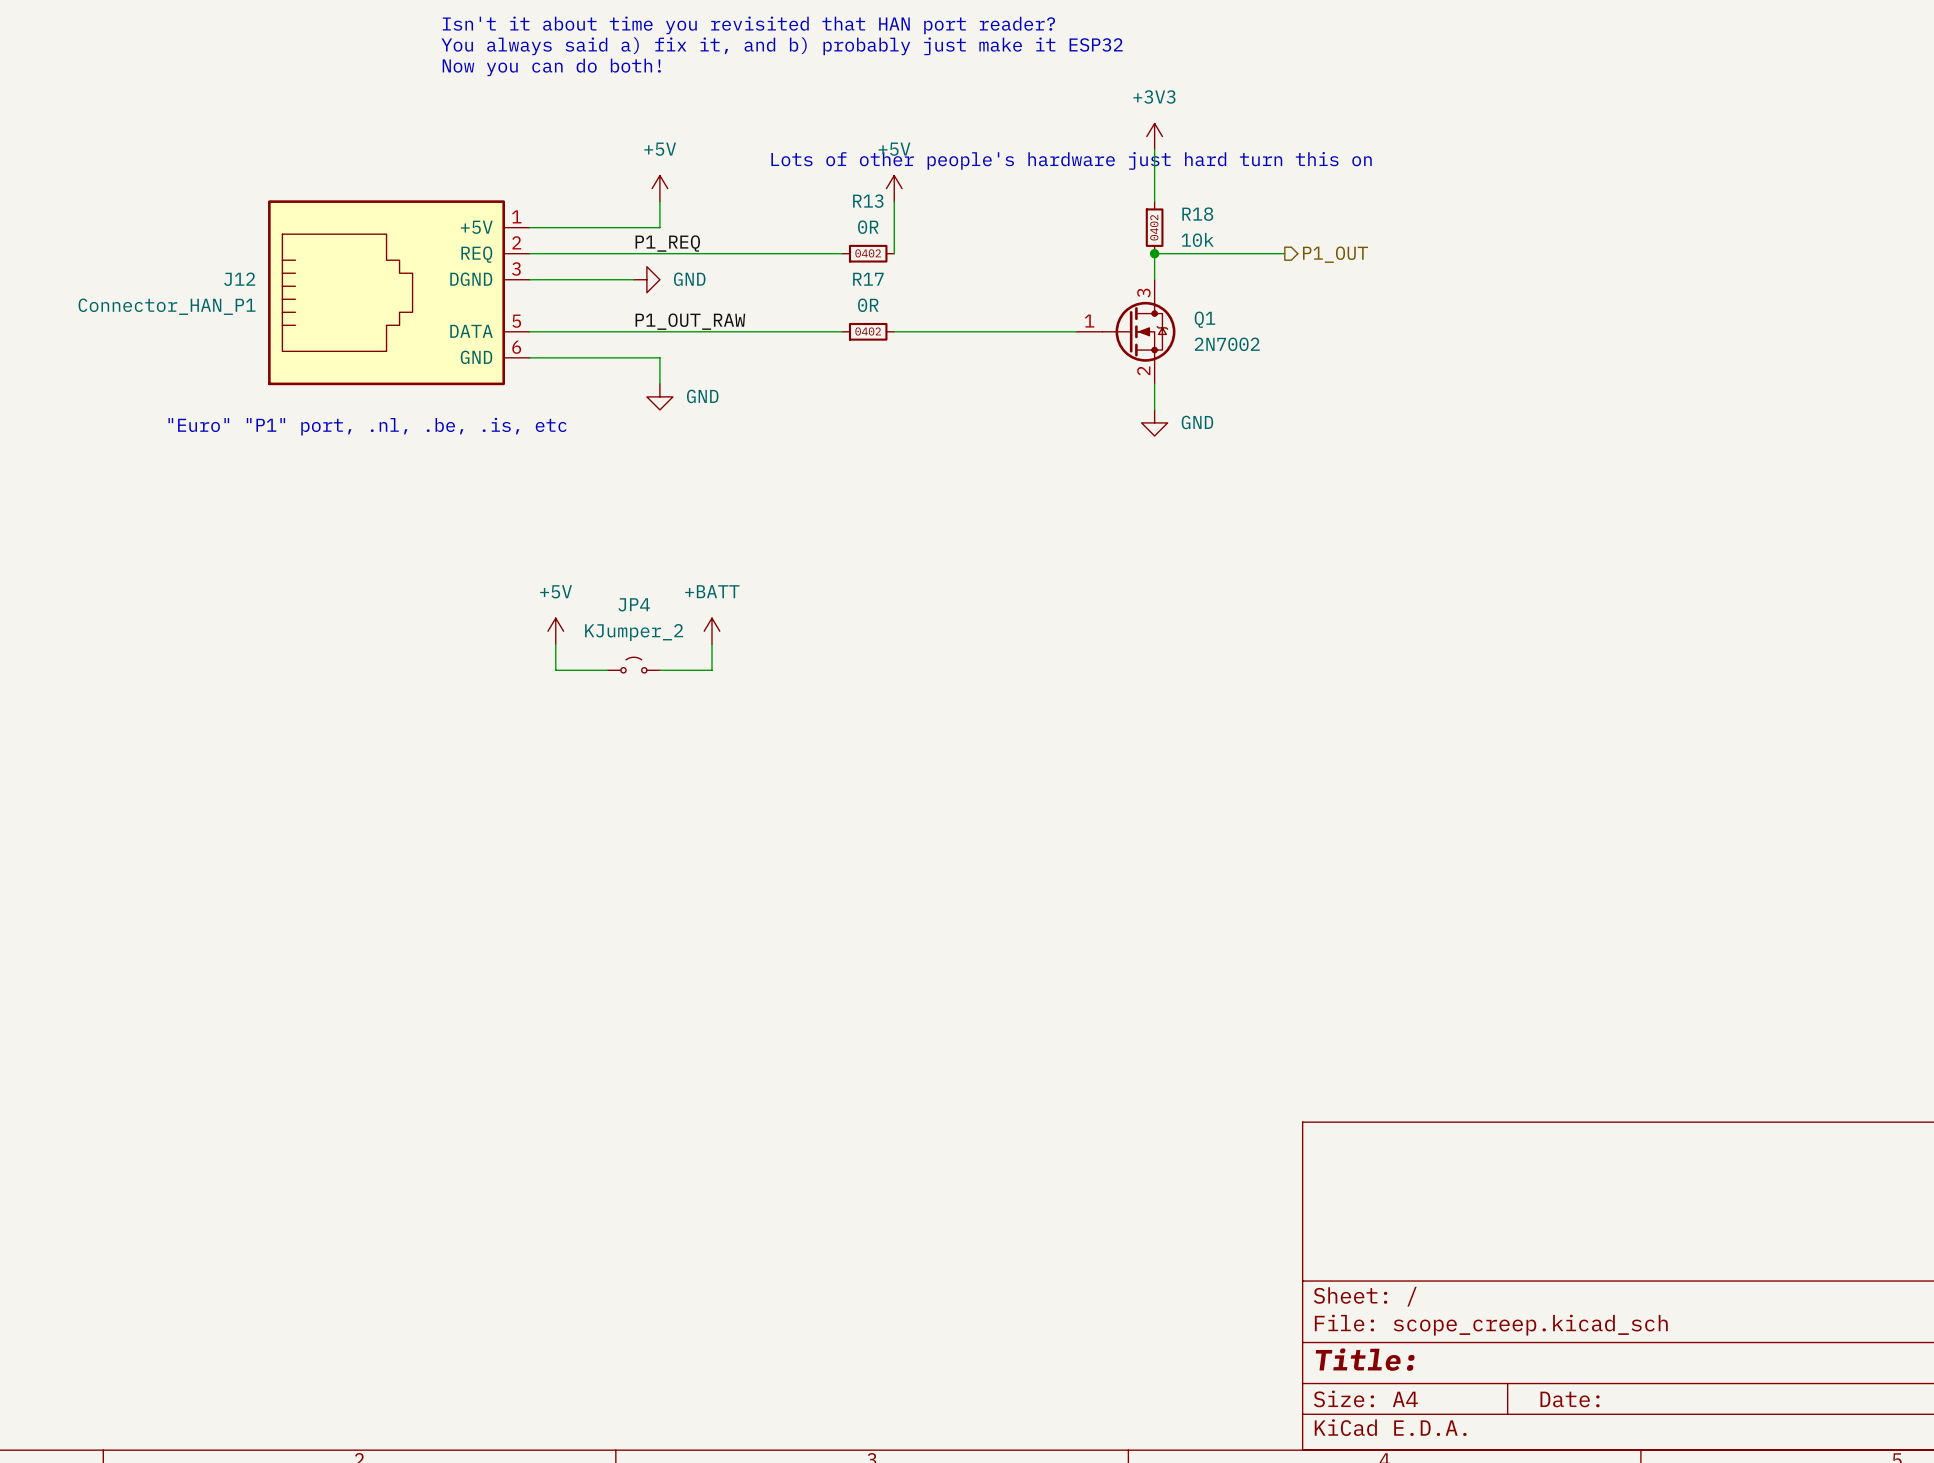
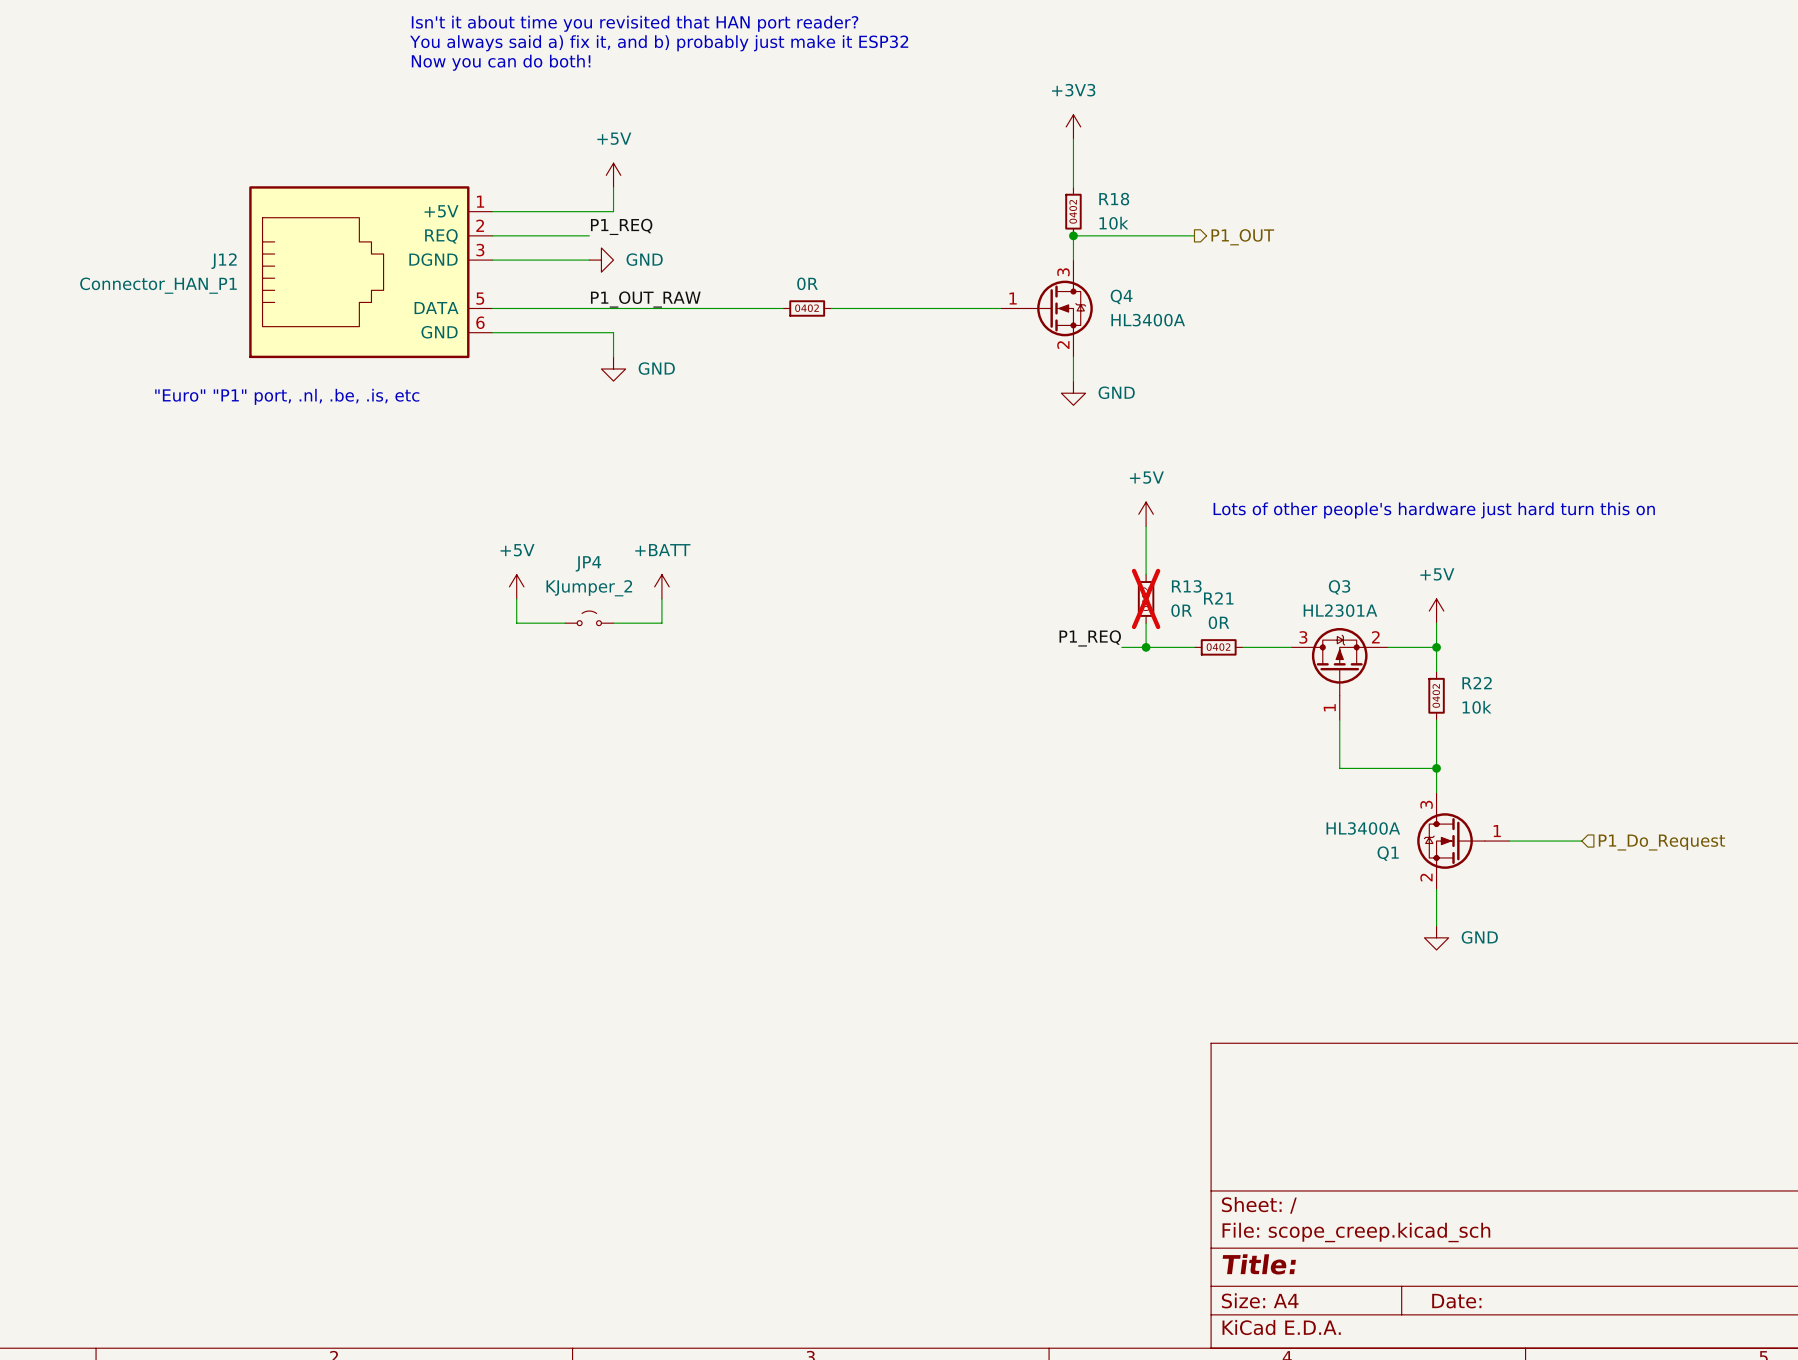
text: Lots of other people's hardware just hard turn this on (1071, 160) -> none
power symbol: +5V (894, 188) -> none
wire: (894, 201) (894, 253) -> none
R13 value position: 0R (868, 227) -> 0R (1181, 610)
wire: (633, 253) (842, 253) -> none
R13 rotation: 0° (868, 253) -> 90° clockwise (1146, 598)
R13 position: (868, 253) -> (1146, 598)
R17 name: R17 (868, 279) -> none
Q1 name: Q1 (1204, 319) -> Q4 (1121, 296)
Q1 value: 2N7002 (1227, 344) -> HL3400A (1148, 320)
text: none -> Lots of other people's hardware just hard turn this on (1434, 510)
power symbol: none -> +5V (1146, 514)
wire: none -> (1146, 526) (1146, 574)
R13 do-not-place cross: none -> (1146, 598)
power symbol: none -> +5V (1436, 611)
wire: none -> (1146, 623) (1146, 647)
wire: none -> (1436, 623) (1436, 671)
label: none -> P1_REQ (1090, 638)
wire: none -> (1121, 647) (1194, 647)
junction: none -> (1146, 647)
R21: none -> 0R (1218, 647)
wire: none -> (1242, 647) (1291, 647)
wire: none -> (1388, 647) (1436, 647)
junction: none -> (1436, 647)
Q3: none -> HL2301A (1339, 674)
R22: none -> 10k (1436, 695)
wire: none -> (1339, 720) (1339, 768) (1436, 768)
wire: none -> (1436, 720) (1436, 792)
junction: none -> (1436, 768)
Q1: none -> HL3400A (1463, 841)
wire: none -> (1509, 841) (1581, 841)
hierarchical label: none -> P1_Do_Request (1661, 842)
wire: none -> (1436, 889) (1436, 925)
power symbol: none -> GND (1436, 937)

